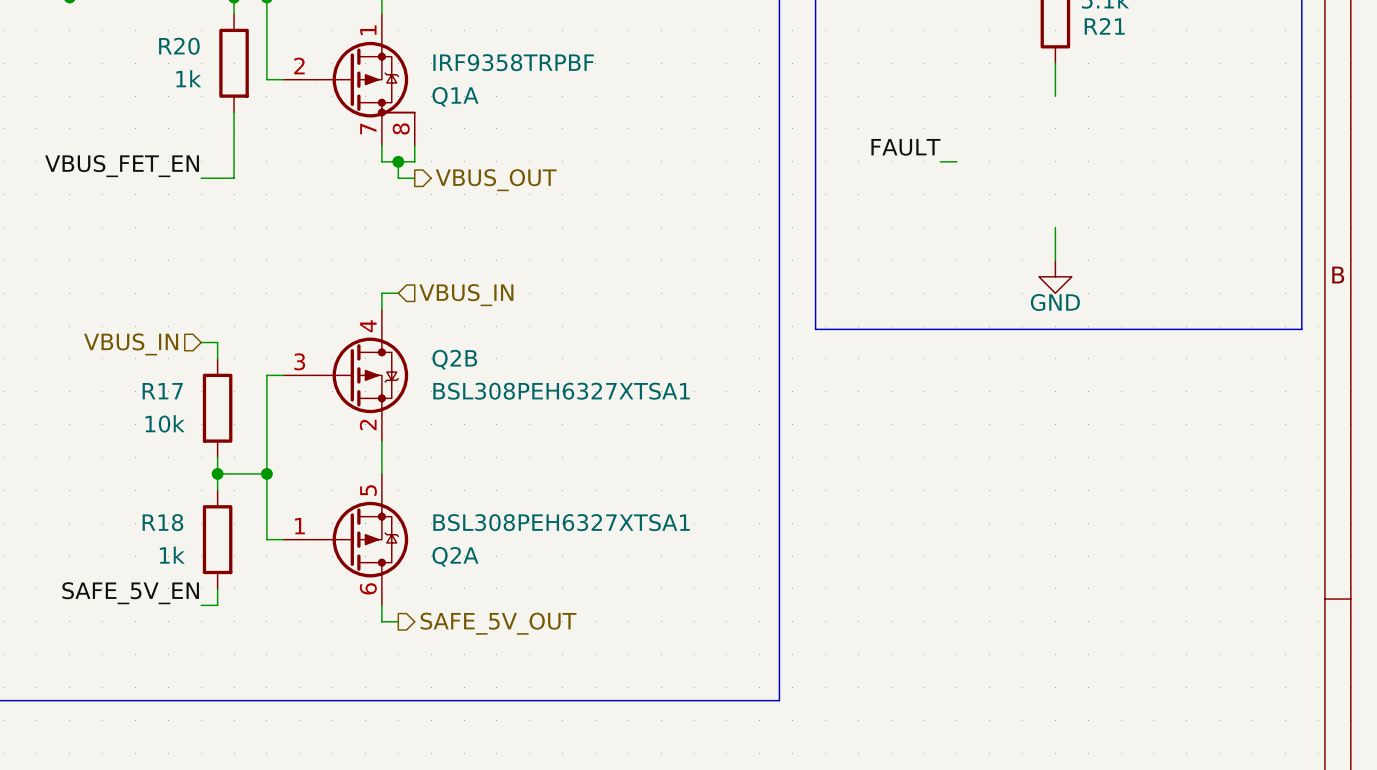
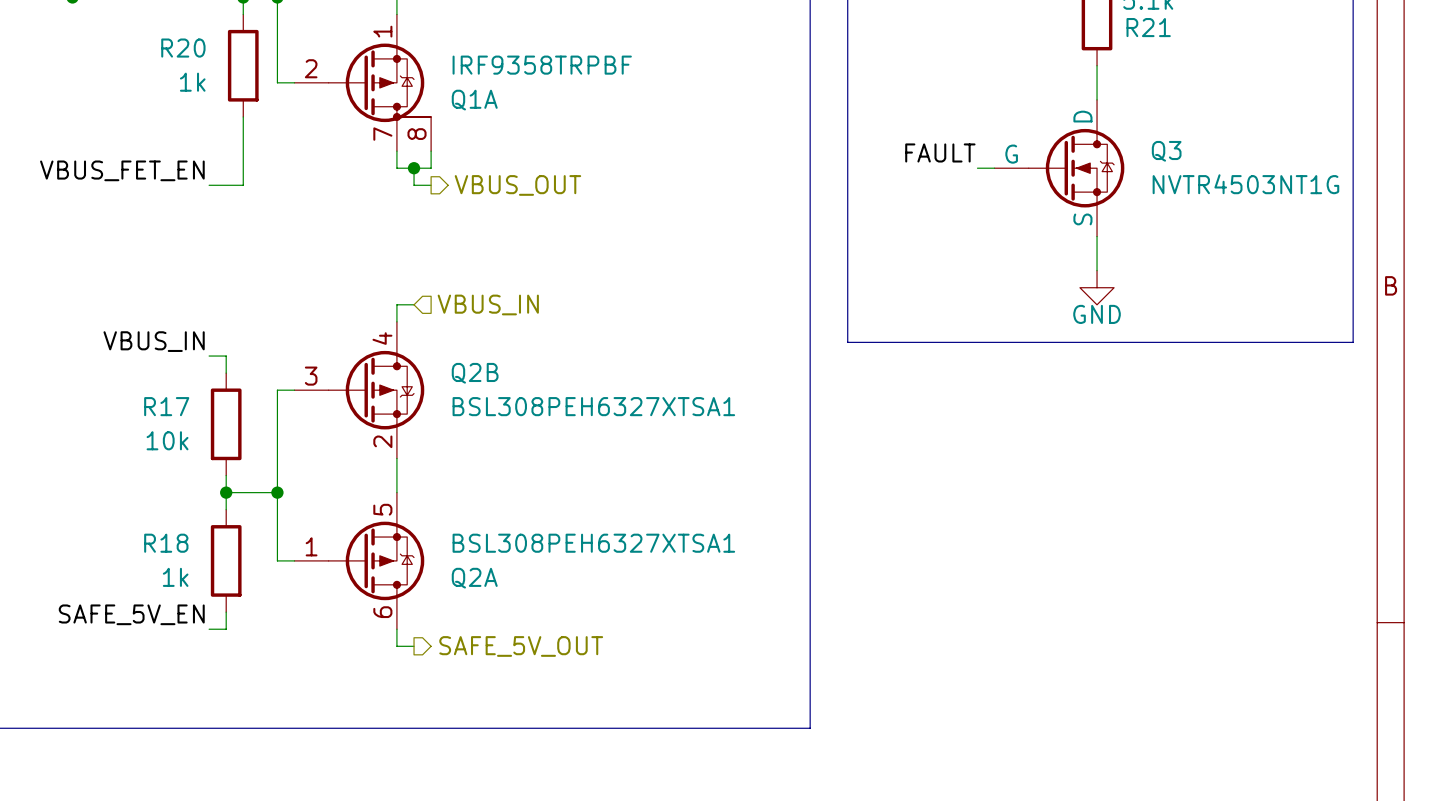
Q3: none -> NVTR4503NT1G (1059, 168)
label: none -> VBUS_IN (154, 341)
hierarchical label: VBUS_IN (131, 344) -> none

